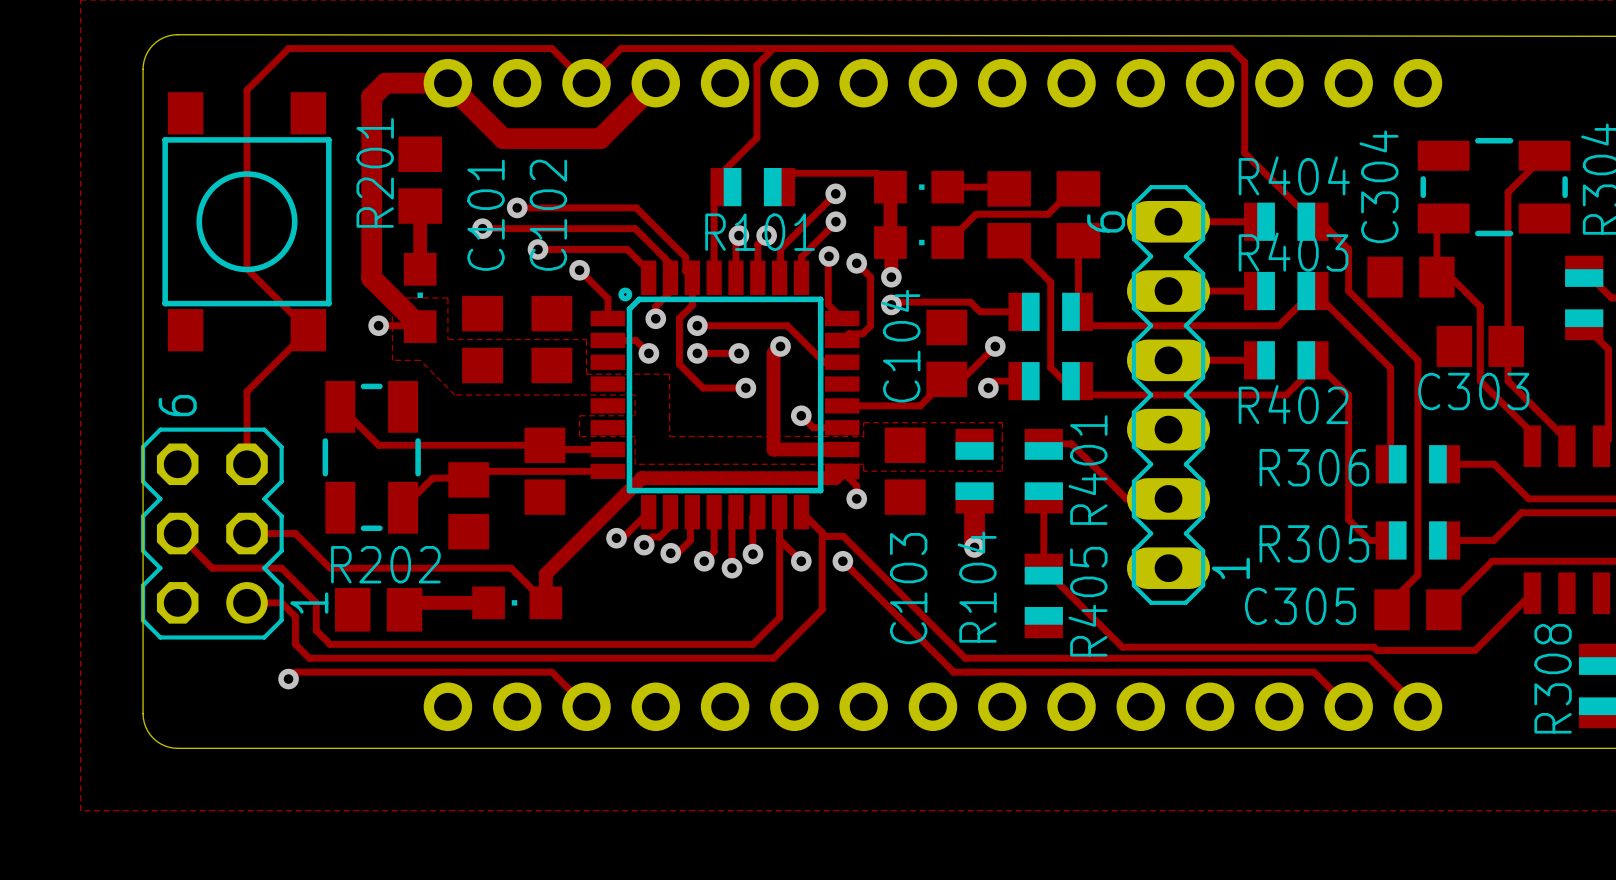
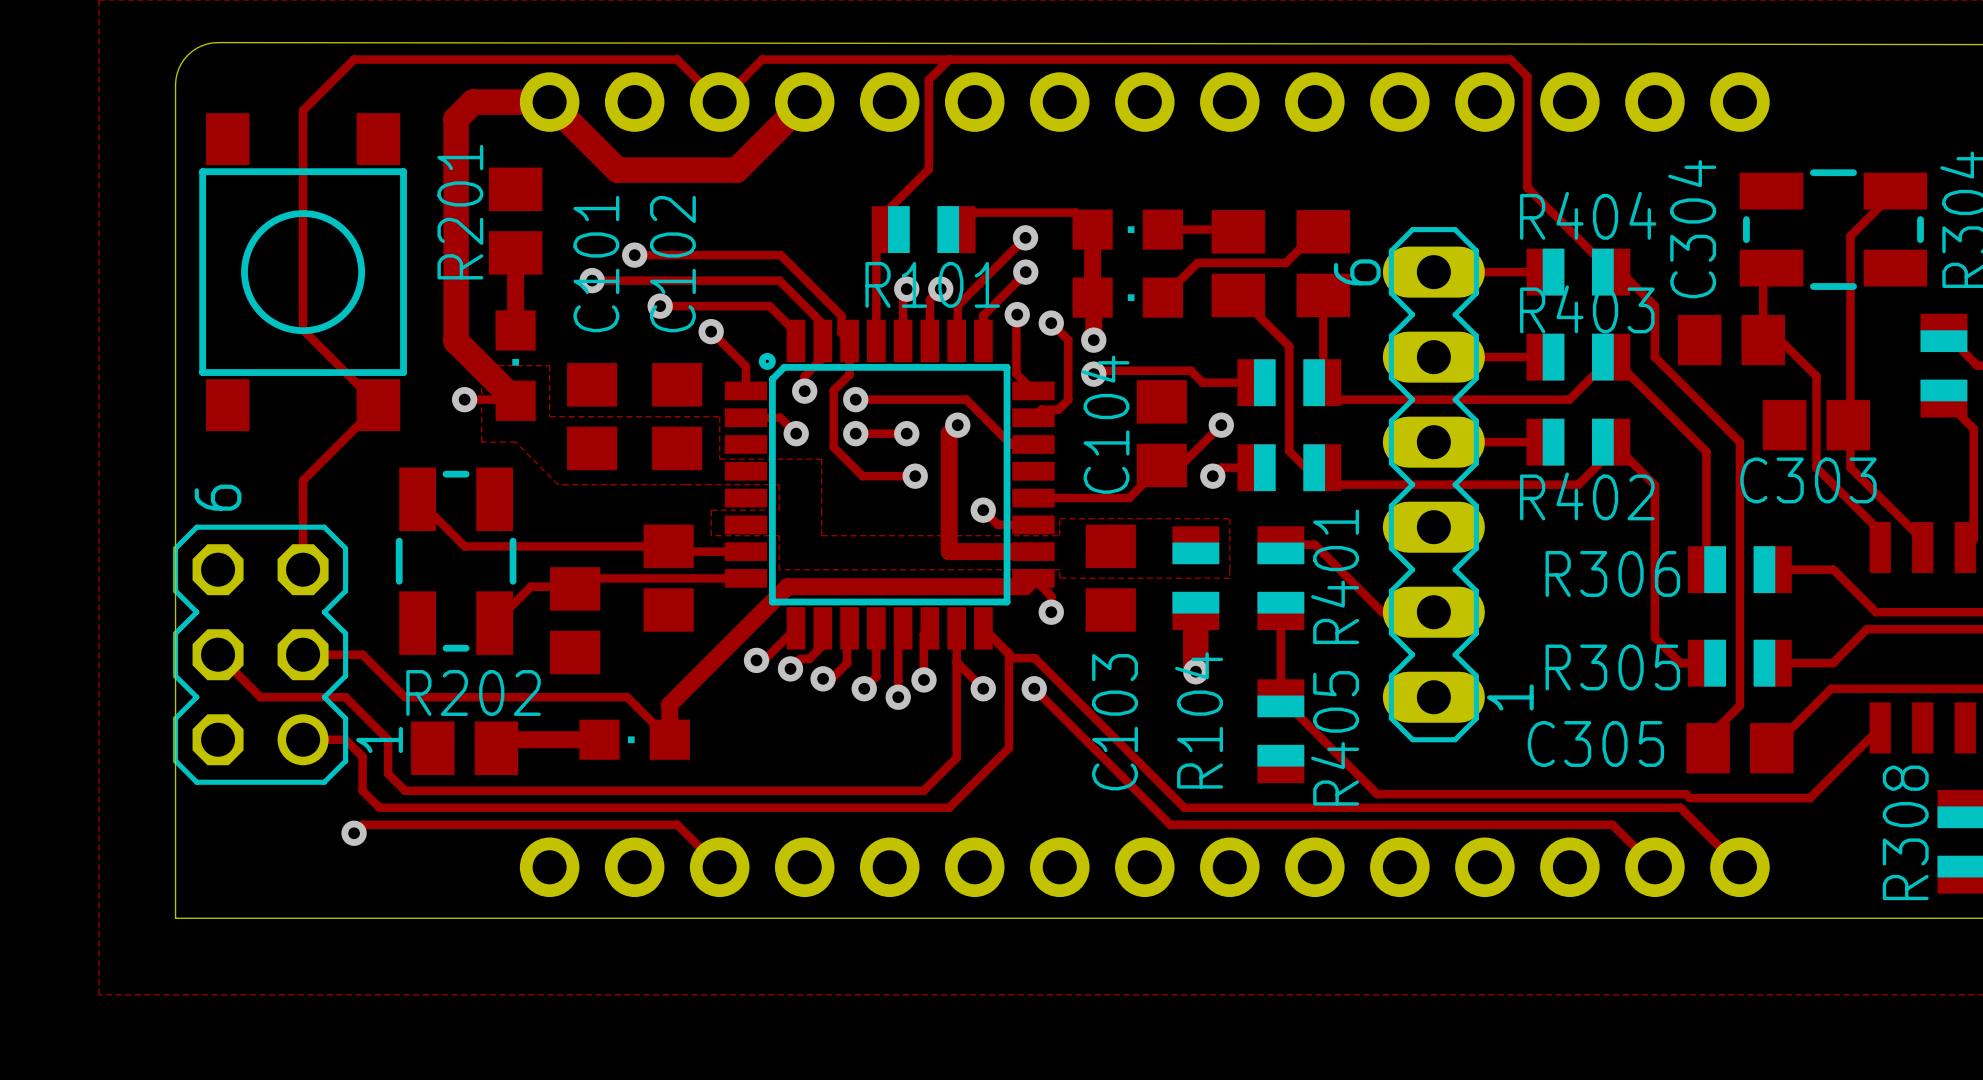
board edge: (143, 713) (145, 726) (153, 738) (164, 745) (177, 748) -> (175, 875) (175, 918) (218, 918)

